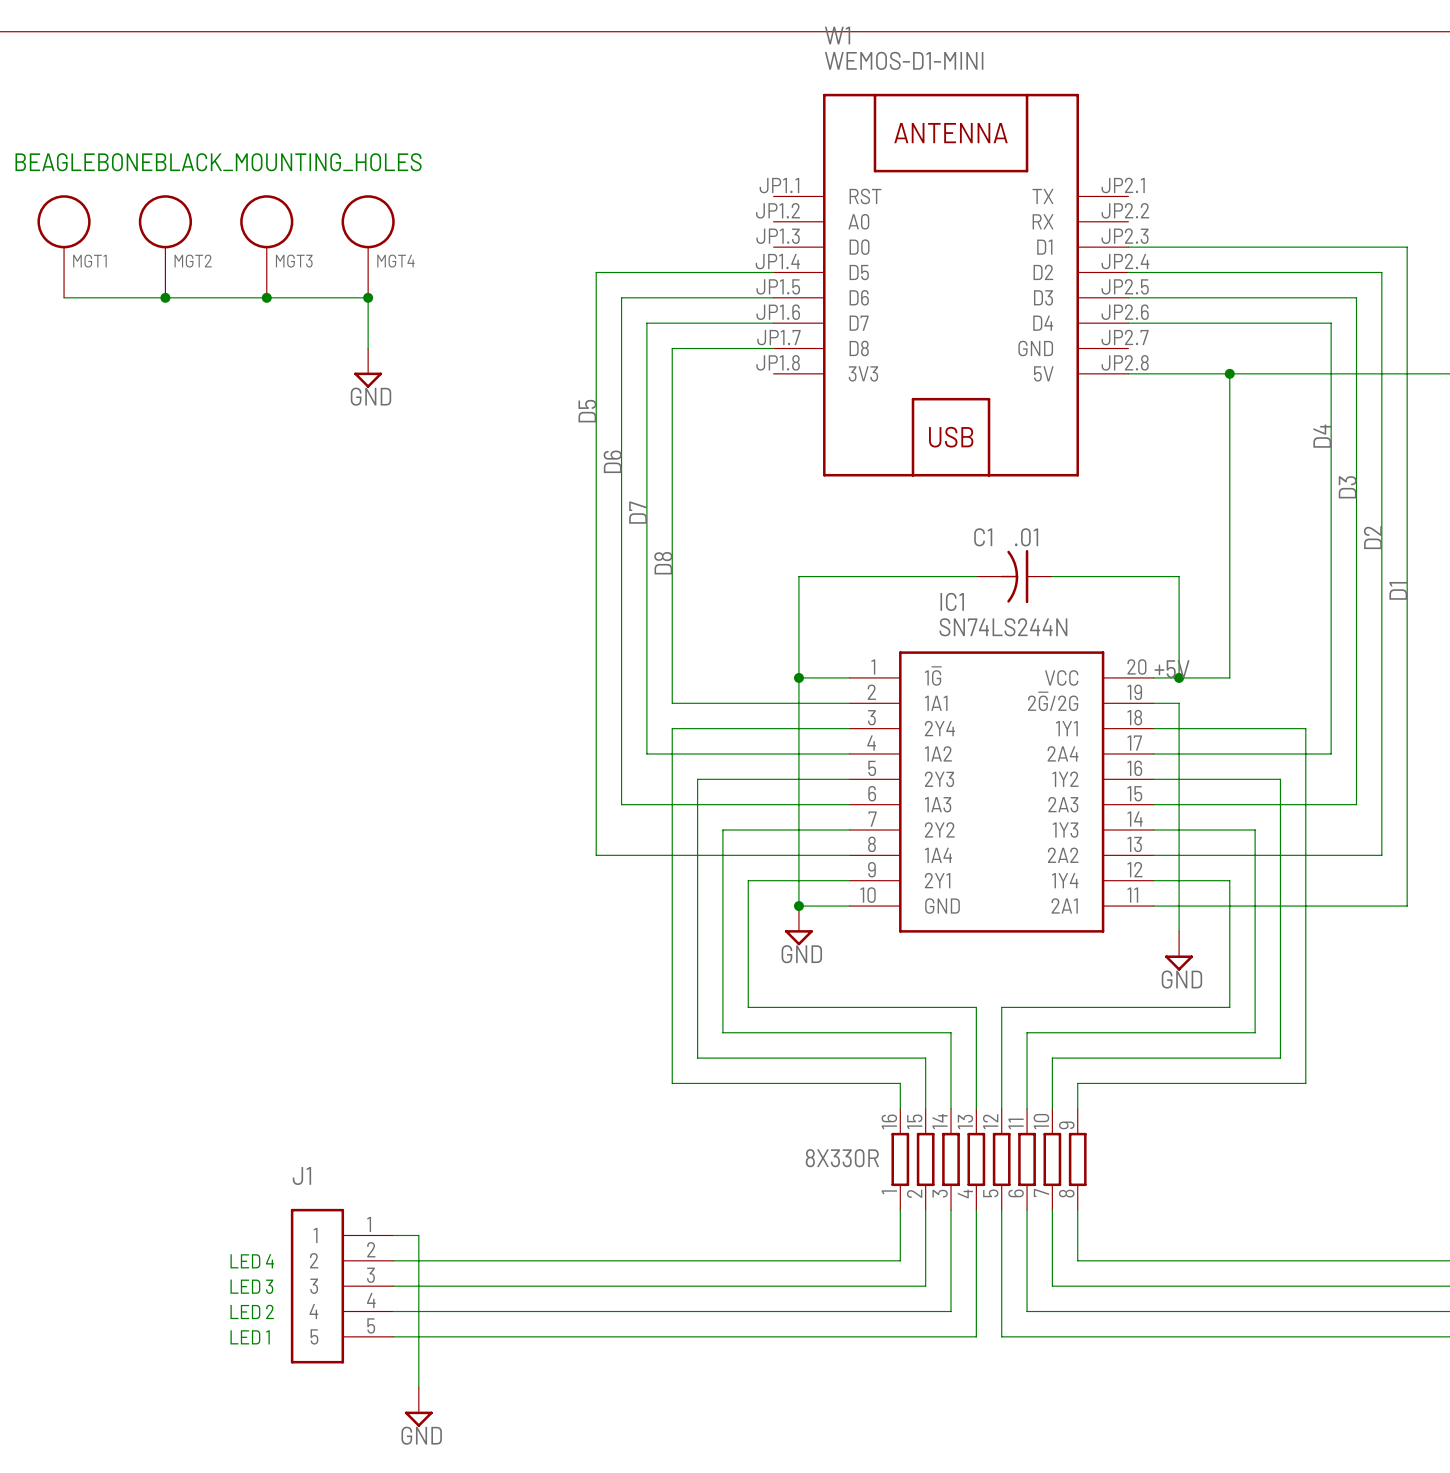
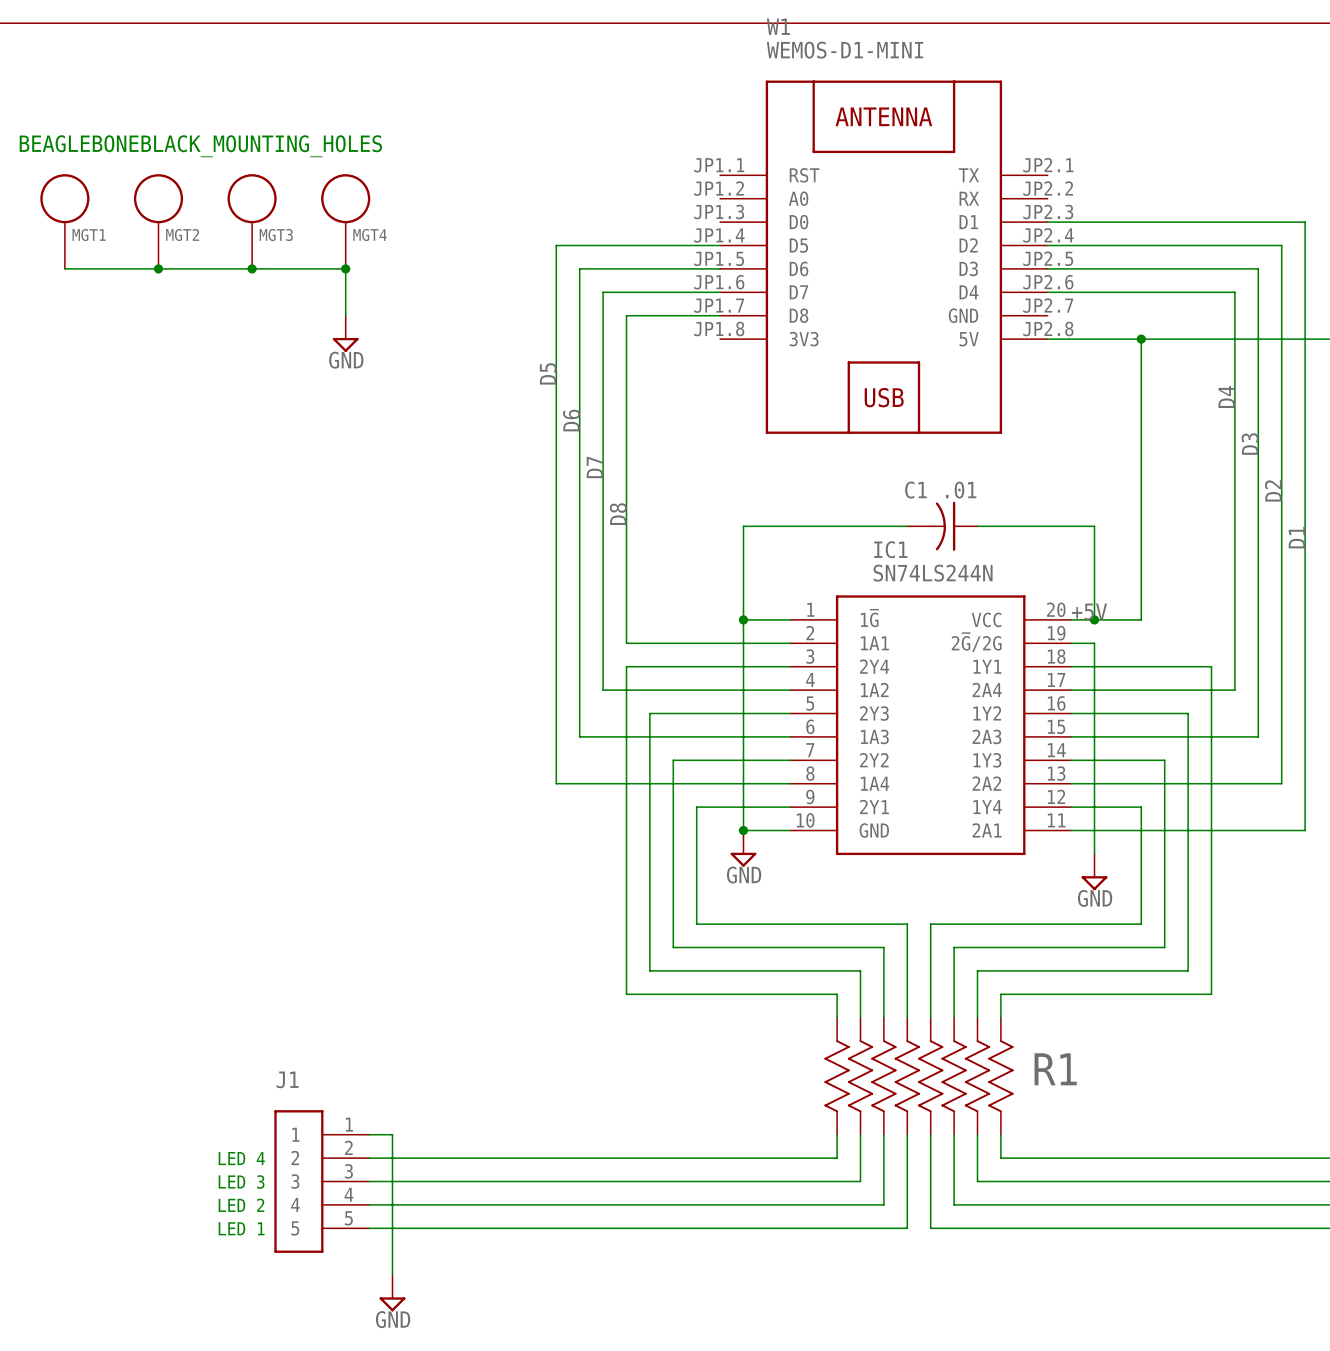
8X330R: (989, 1159) -> none
R1: none -> (919, 1076)

